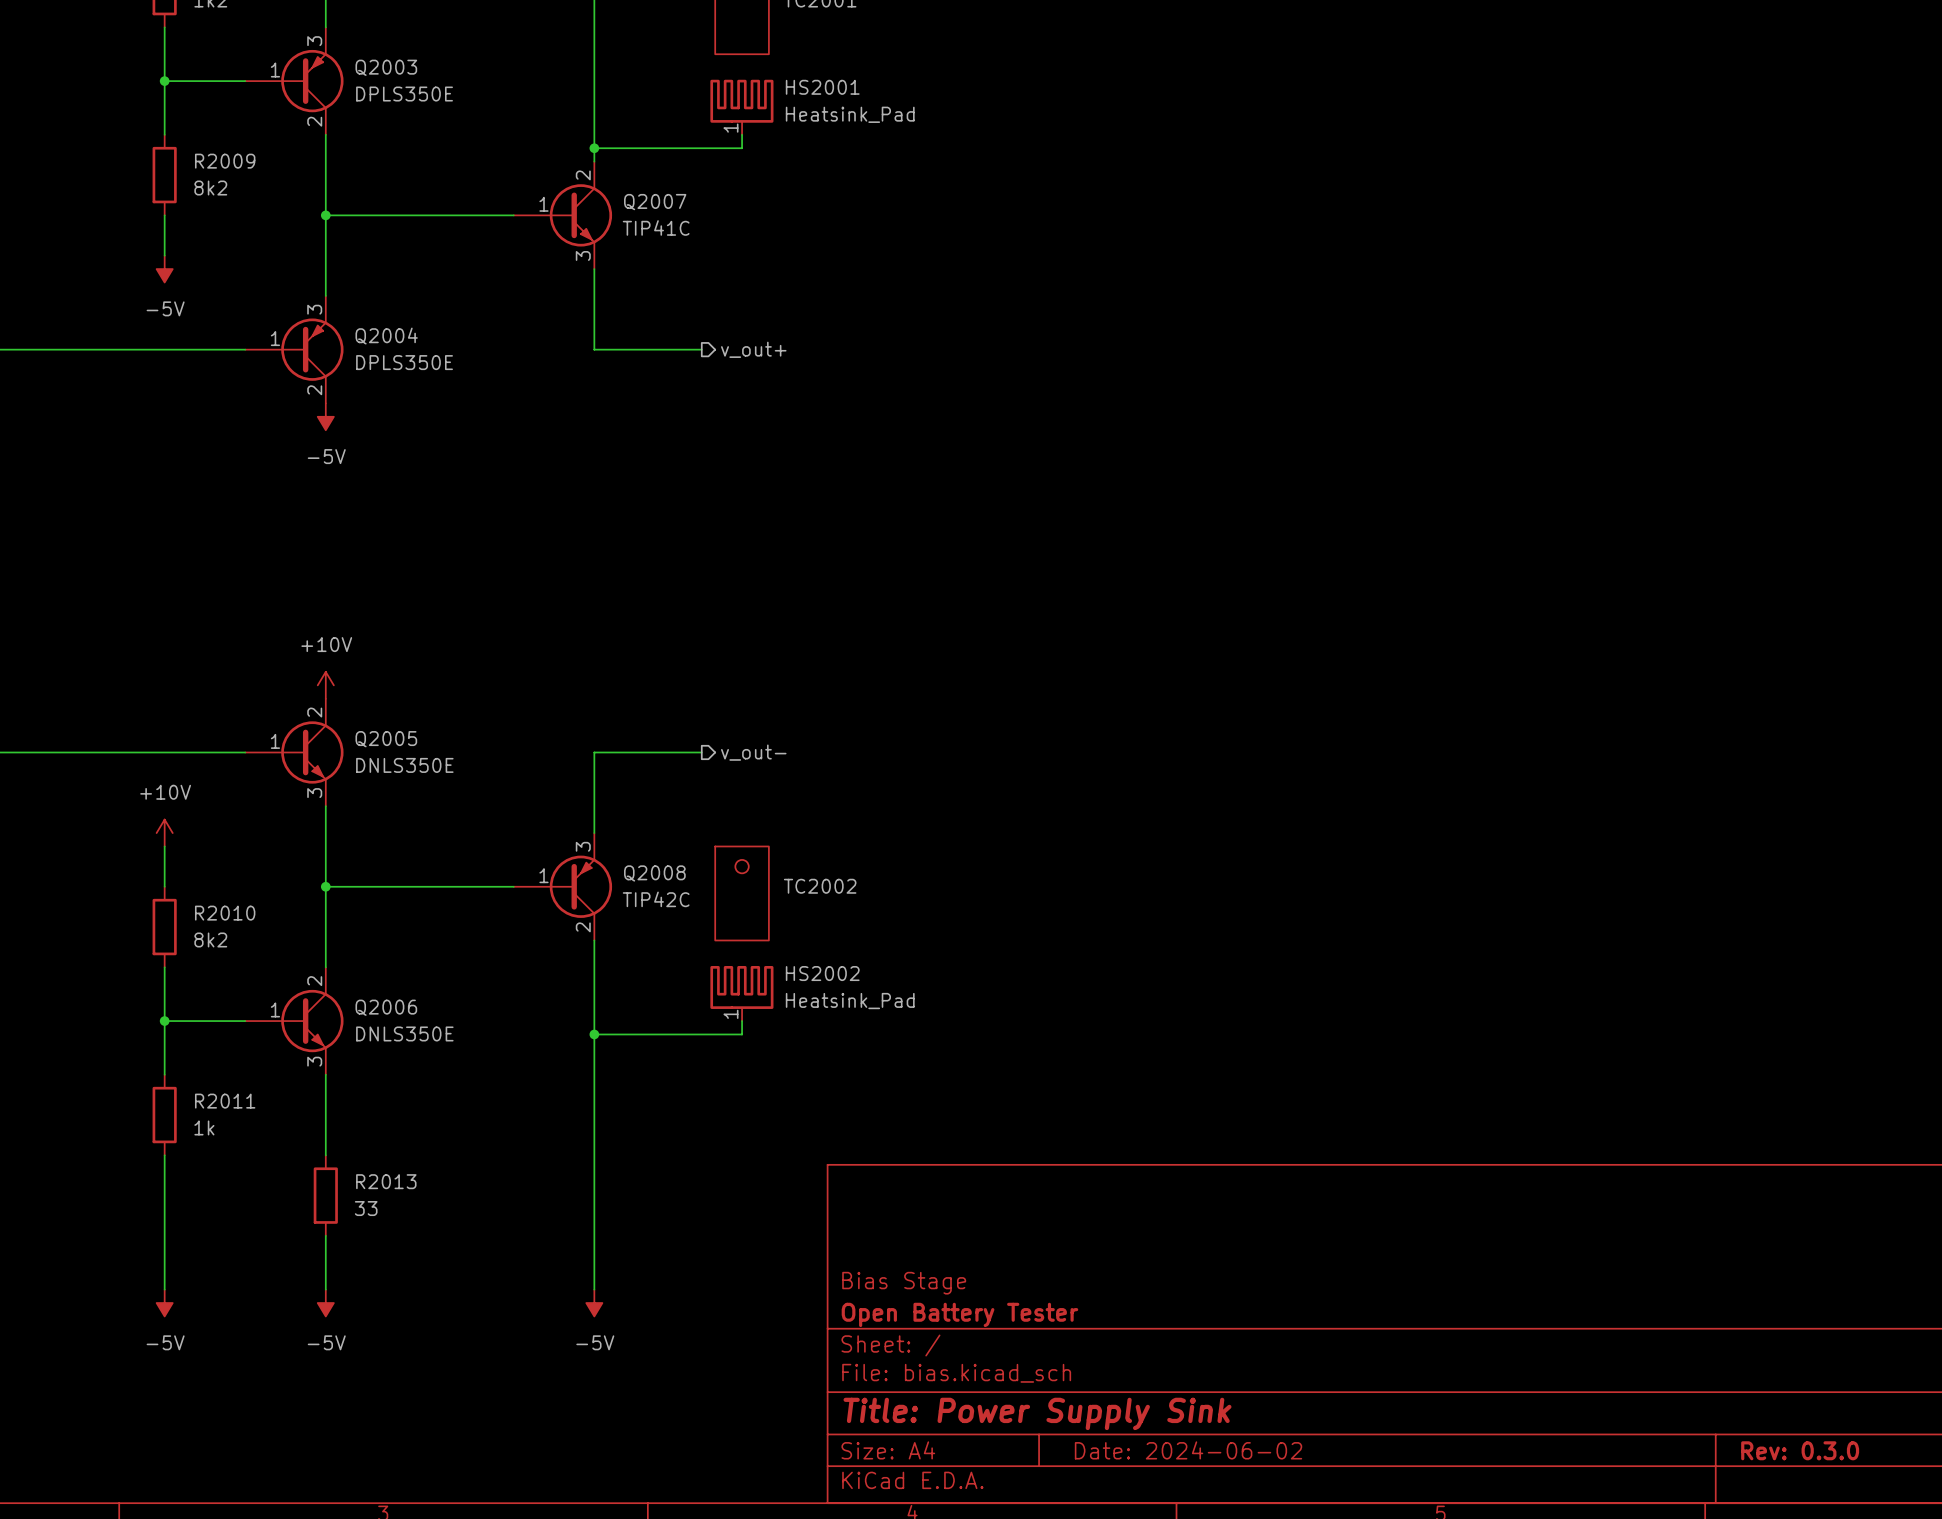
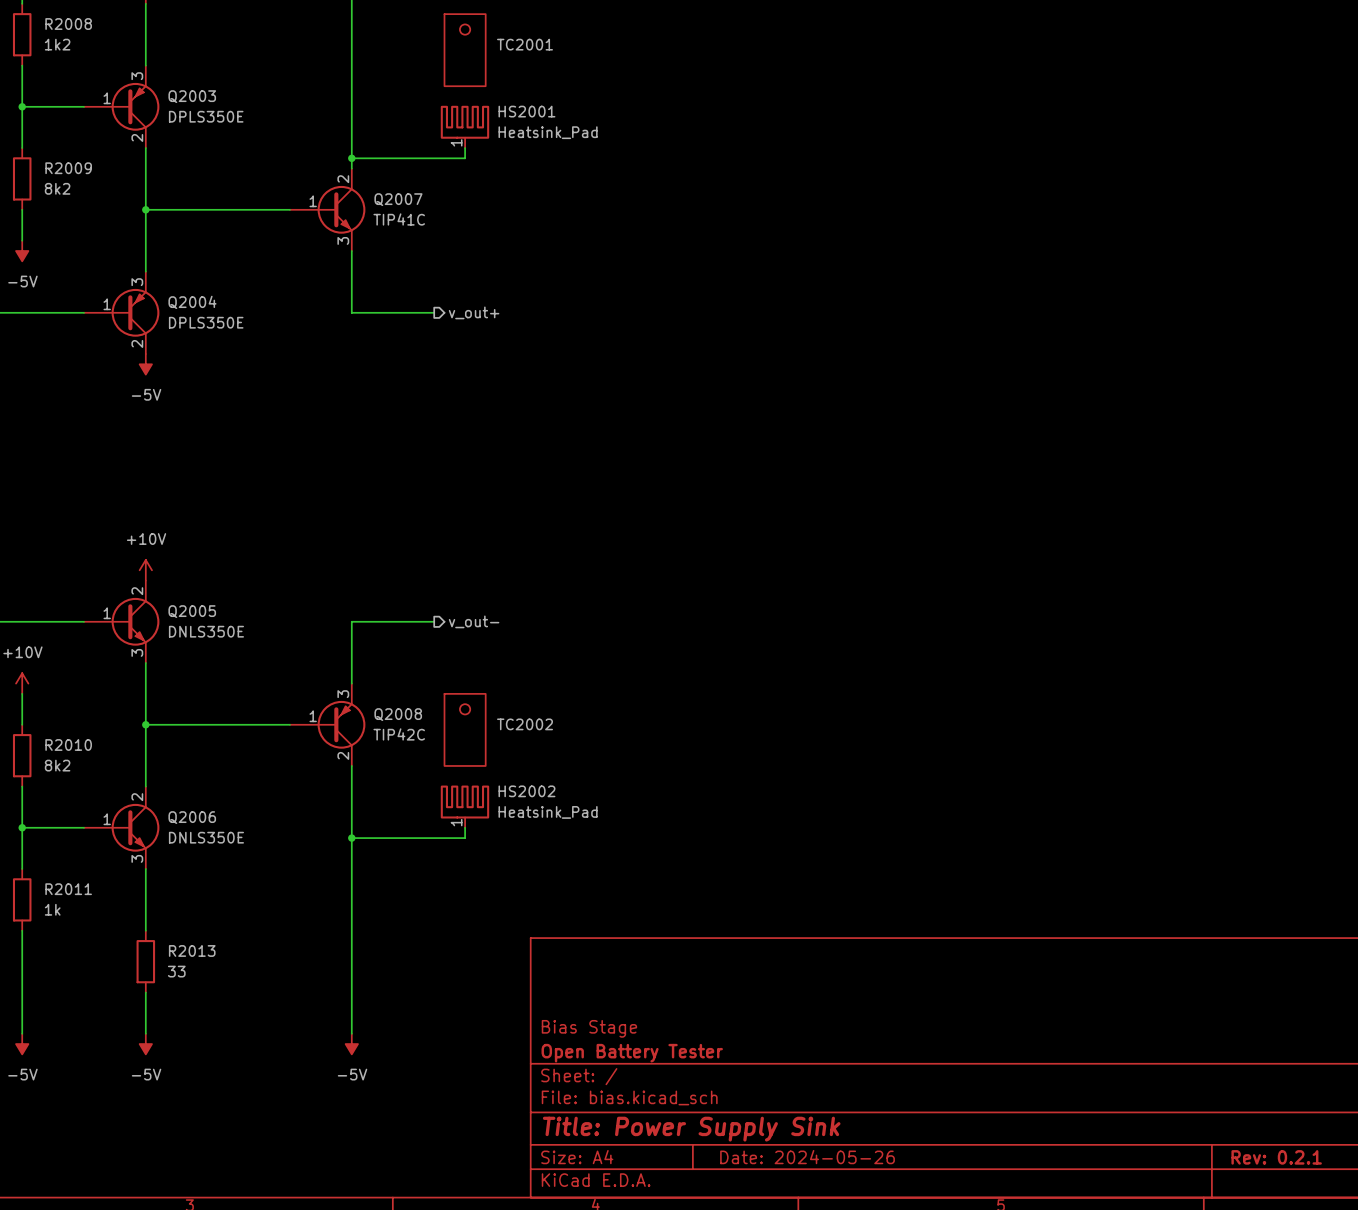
title block: Date: 2024-06-02 (1188, 1450) -> Date: 2024-05-26 (807, 1157)
title block: Rev: 0.3.0 (1800, 1450) -> Rev: 0.2.1 (1276, 1157)

